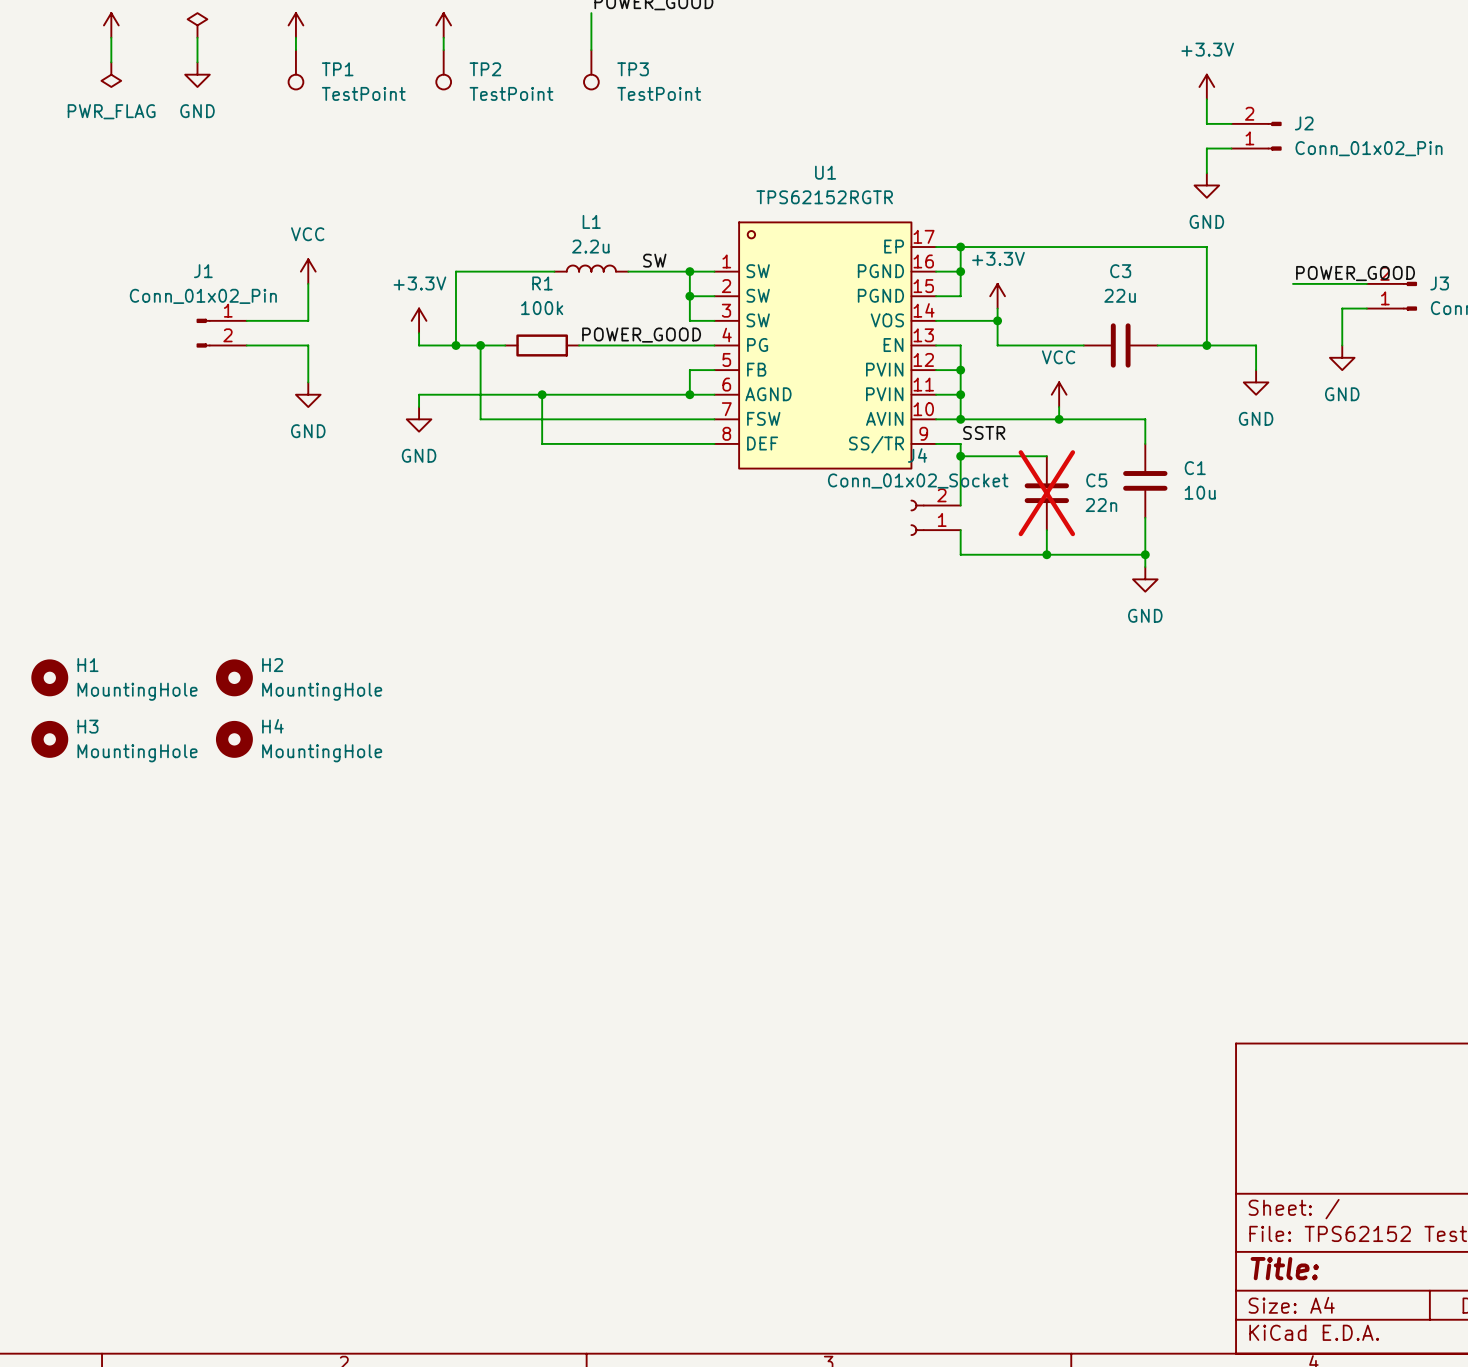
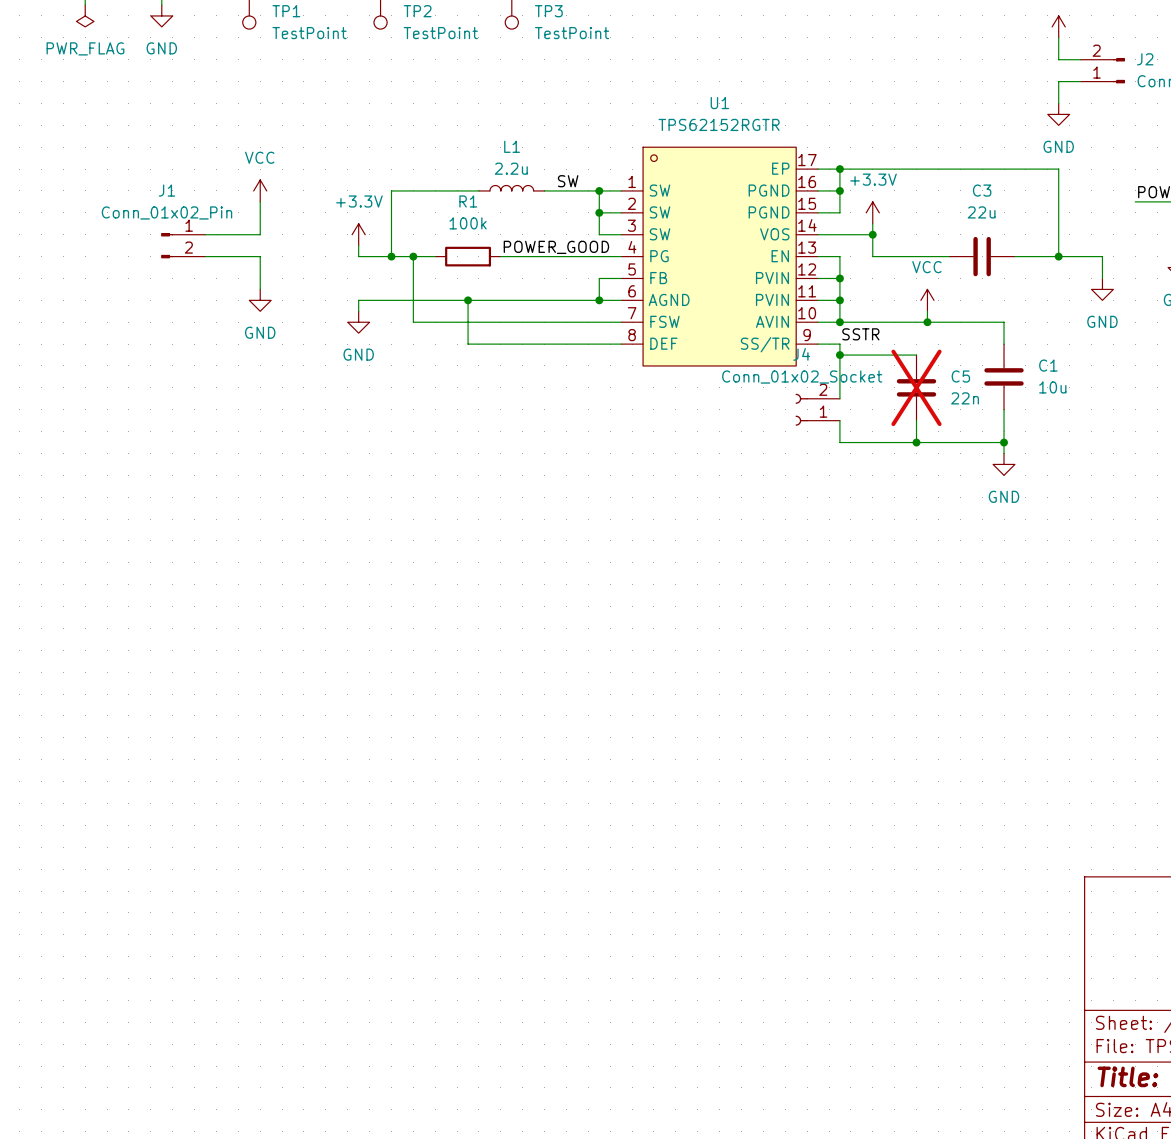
H1: MountingHole (49, 677) -> none
H2: MountingHole (234, 677) -> none
H3: MountingHole (49, 739) -> none
H4: MountingHole (234, 739) -> none

